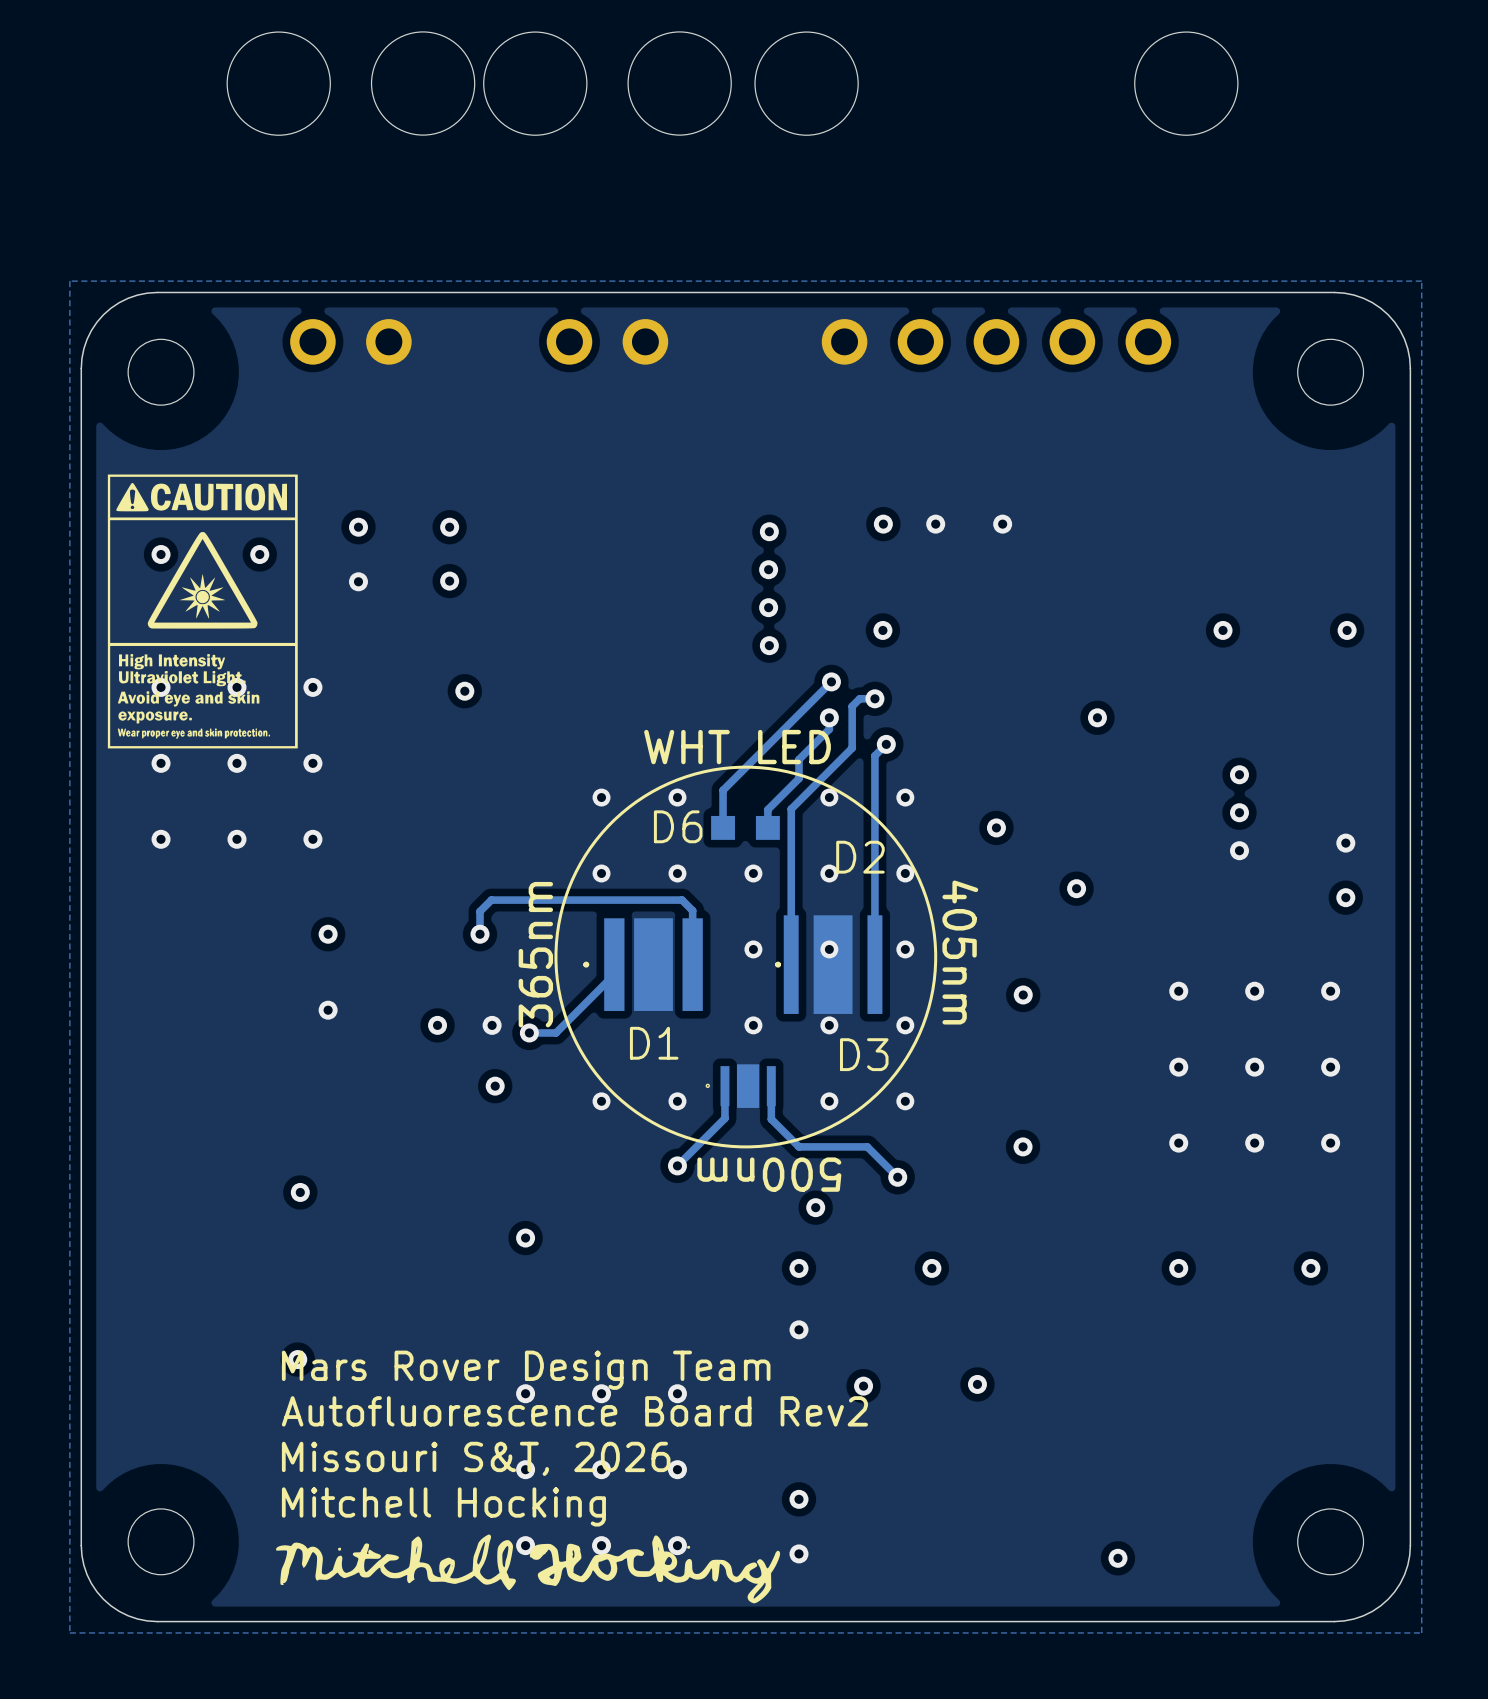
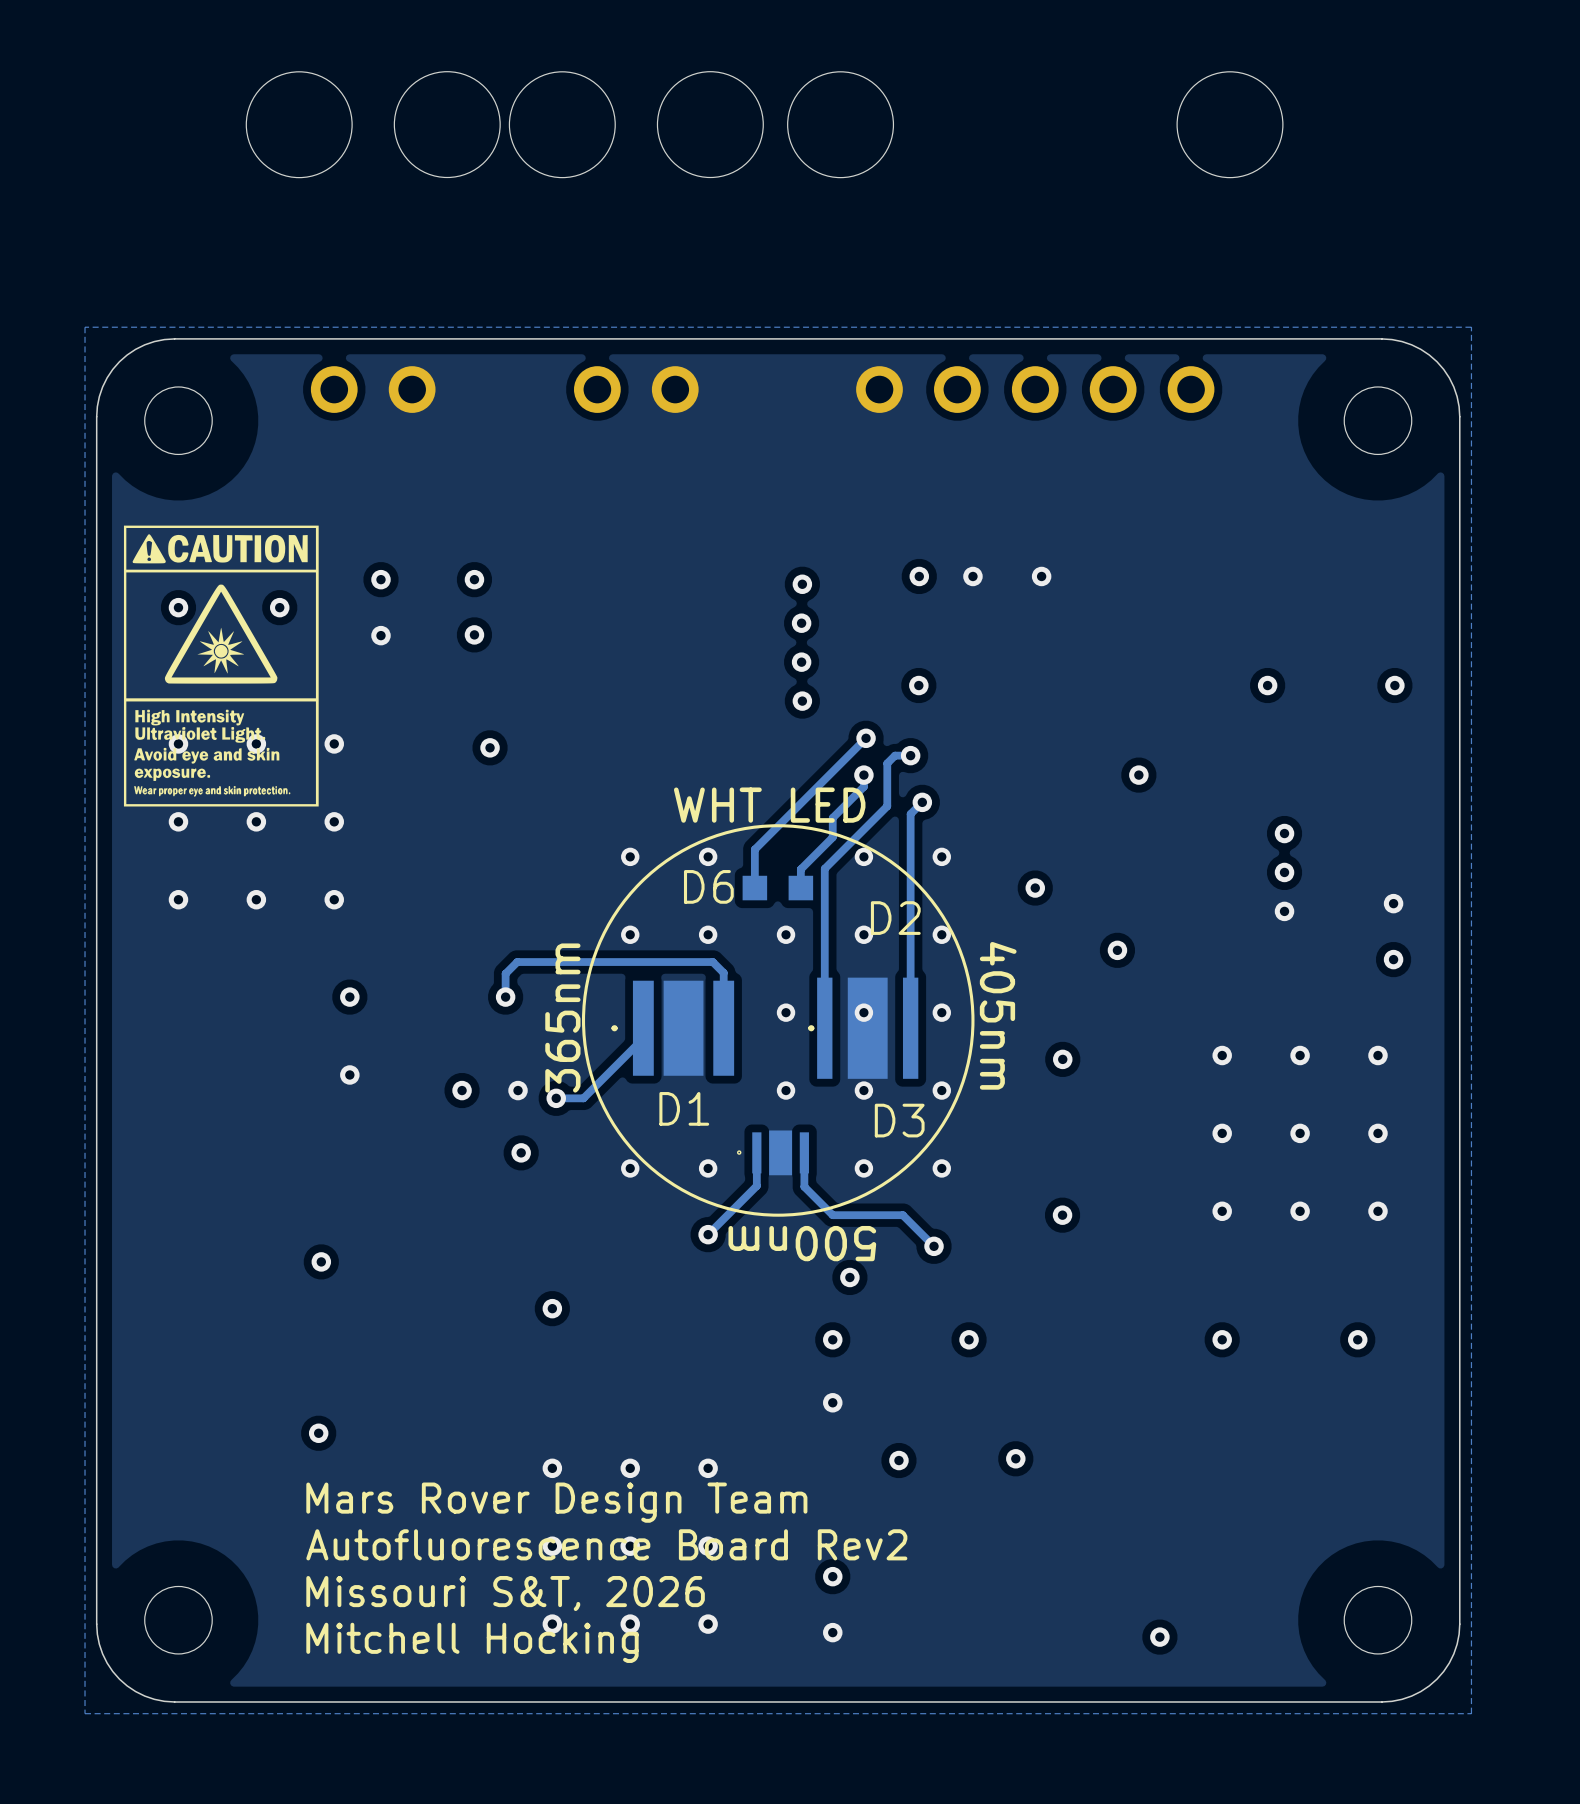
text: Mars Rover Design Team (526, 1370) -> none
text: Autofluorescence Board Rev2 (574, 1411) -> Mars Rover Design Team (556, 1502)
text: Missouri S&T, 2026 (476, 1458) -> Autofluorescence Board Rev2 (606, 1544)
text: Mitchell Hocking (443, 1506) -> Missouri S&T, 2026 (505, 1593)
drawing: [276, 1534, 781, 1604] -> none
text: none -> Mitchell Hocking (472, 1642)

